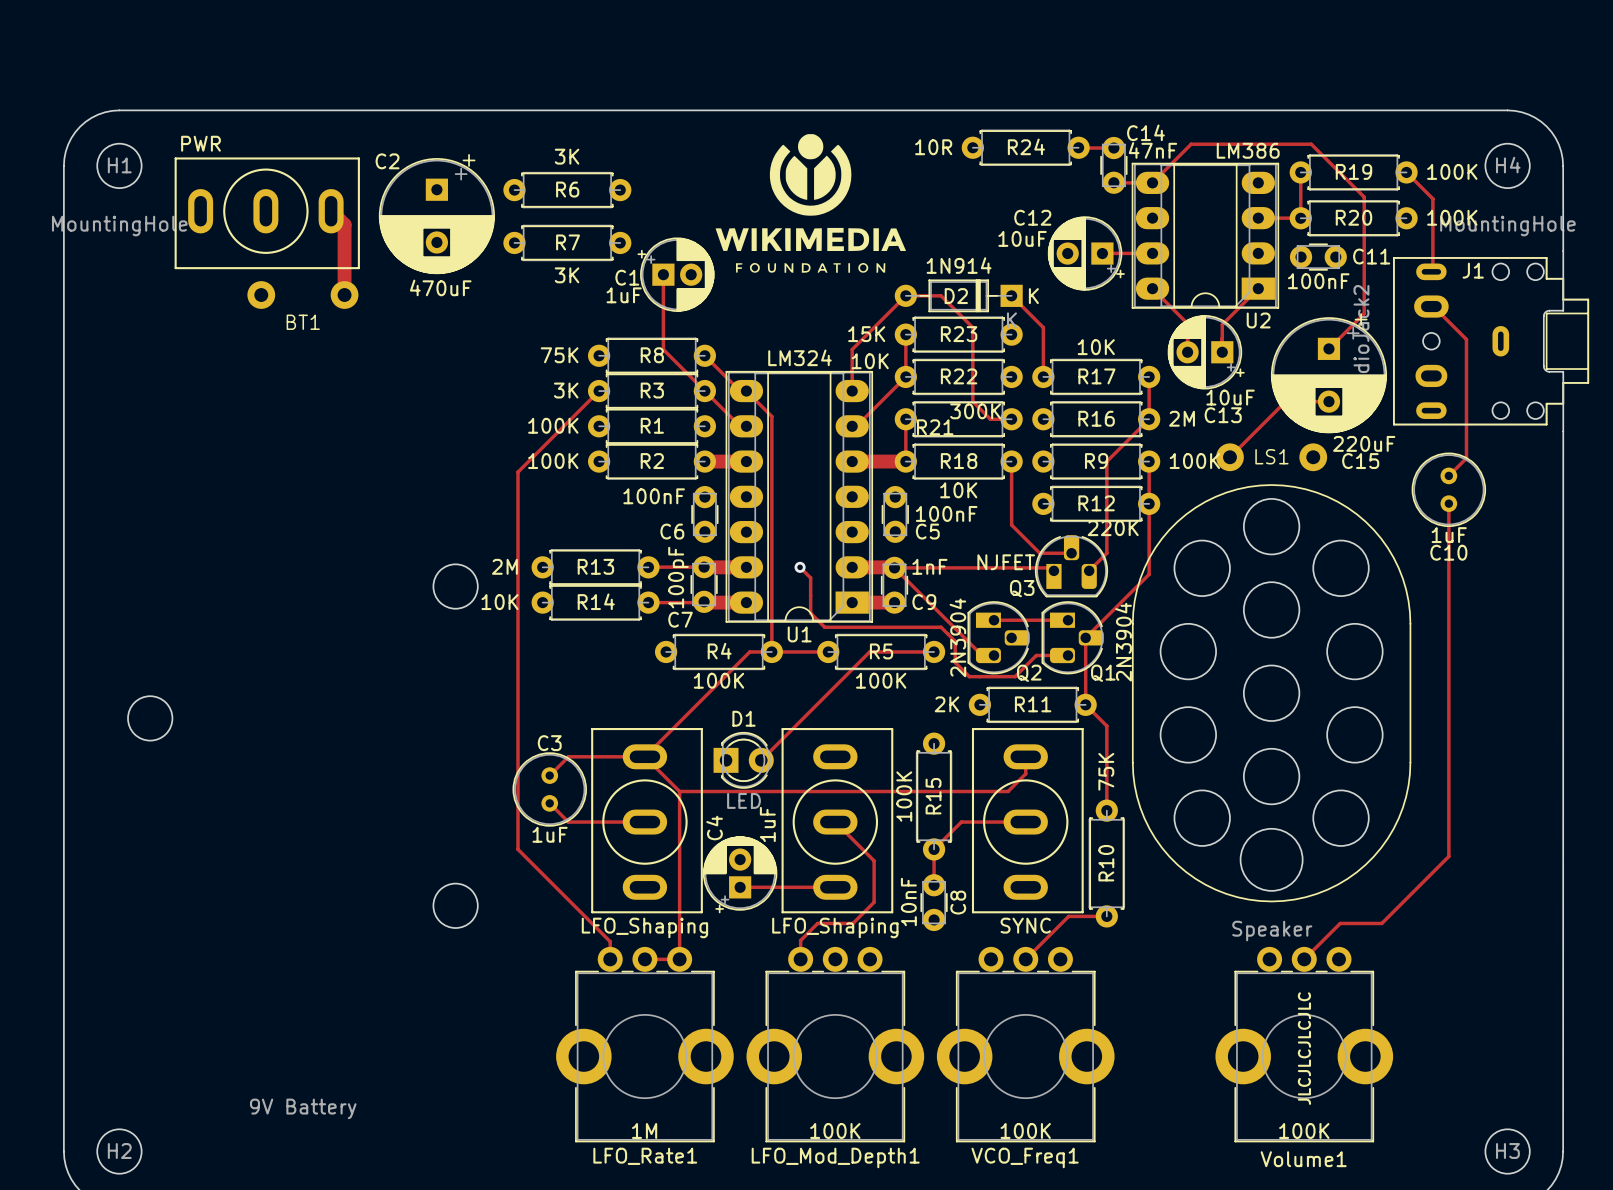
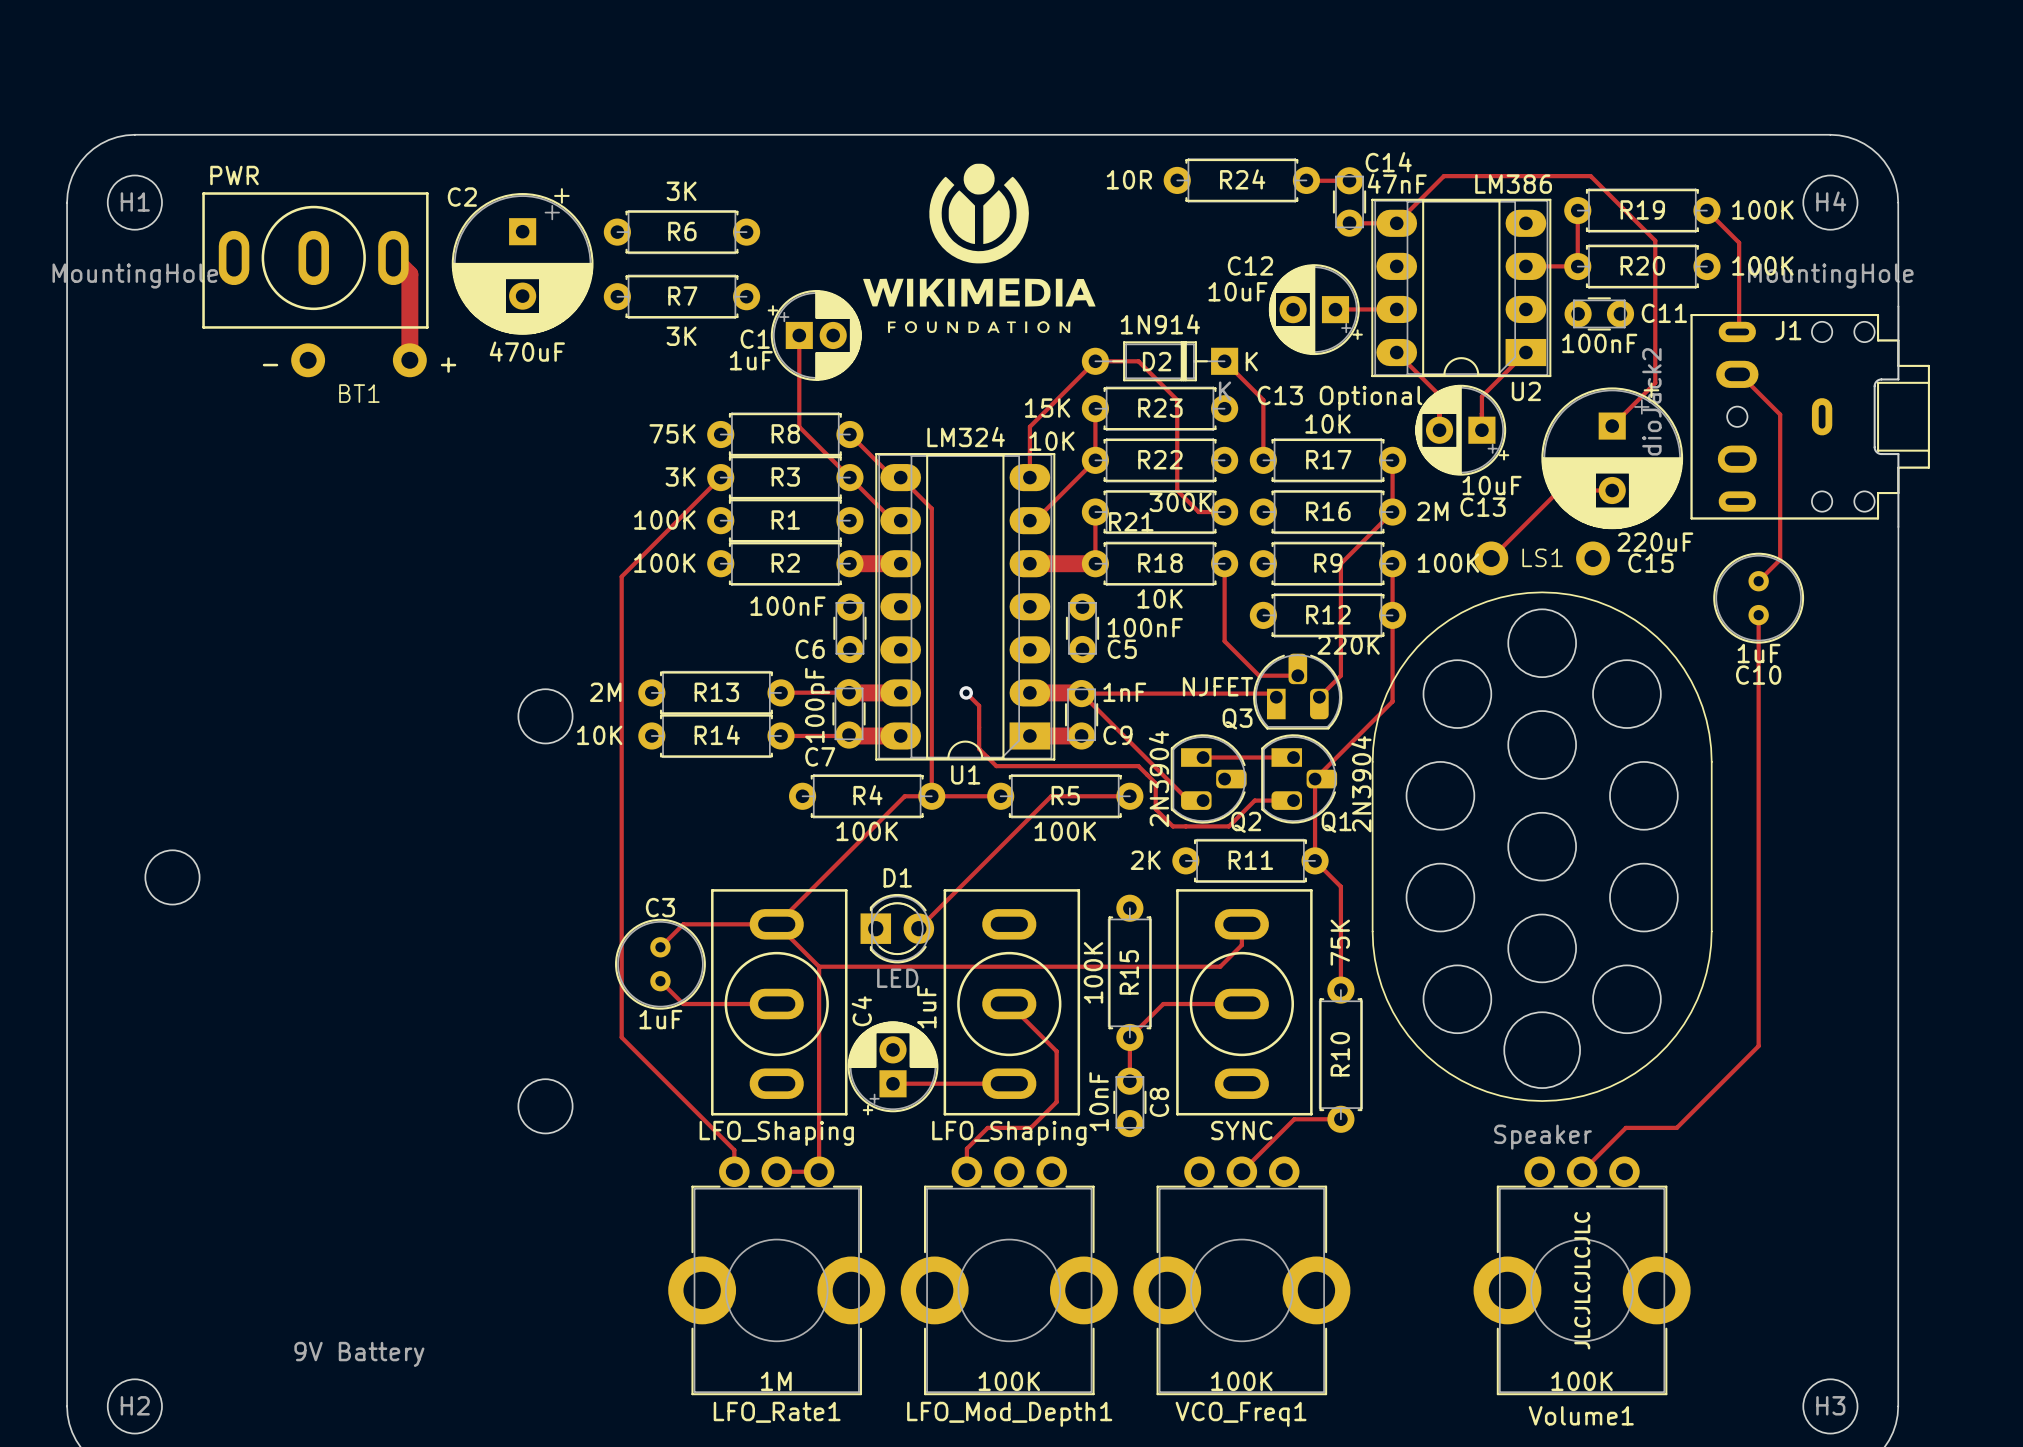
text: none -> - (270, 365)
text: none -> + (448, 365)
text: none -> C13 Optional (1339, 398)

